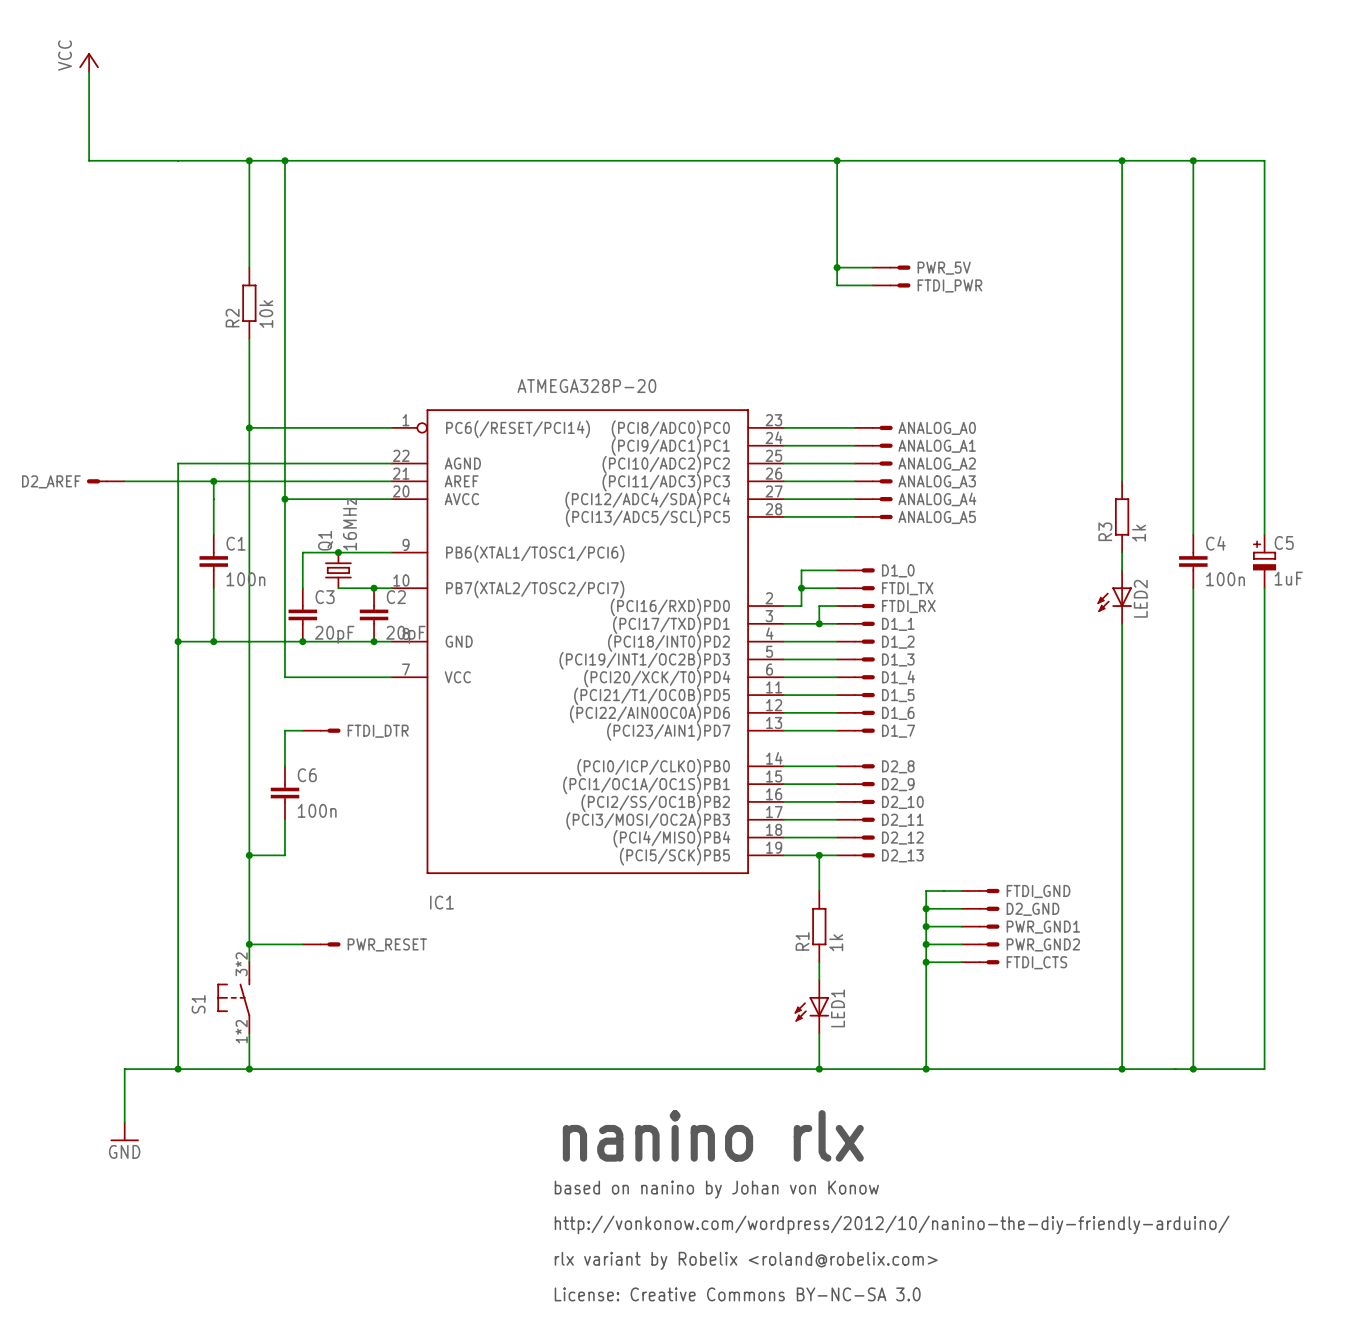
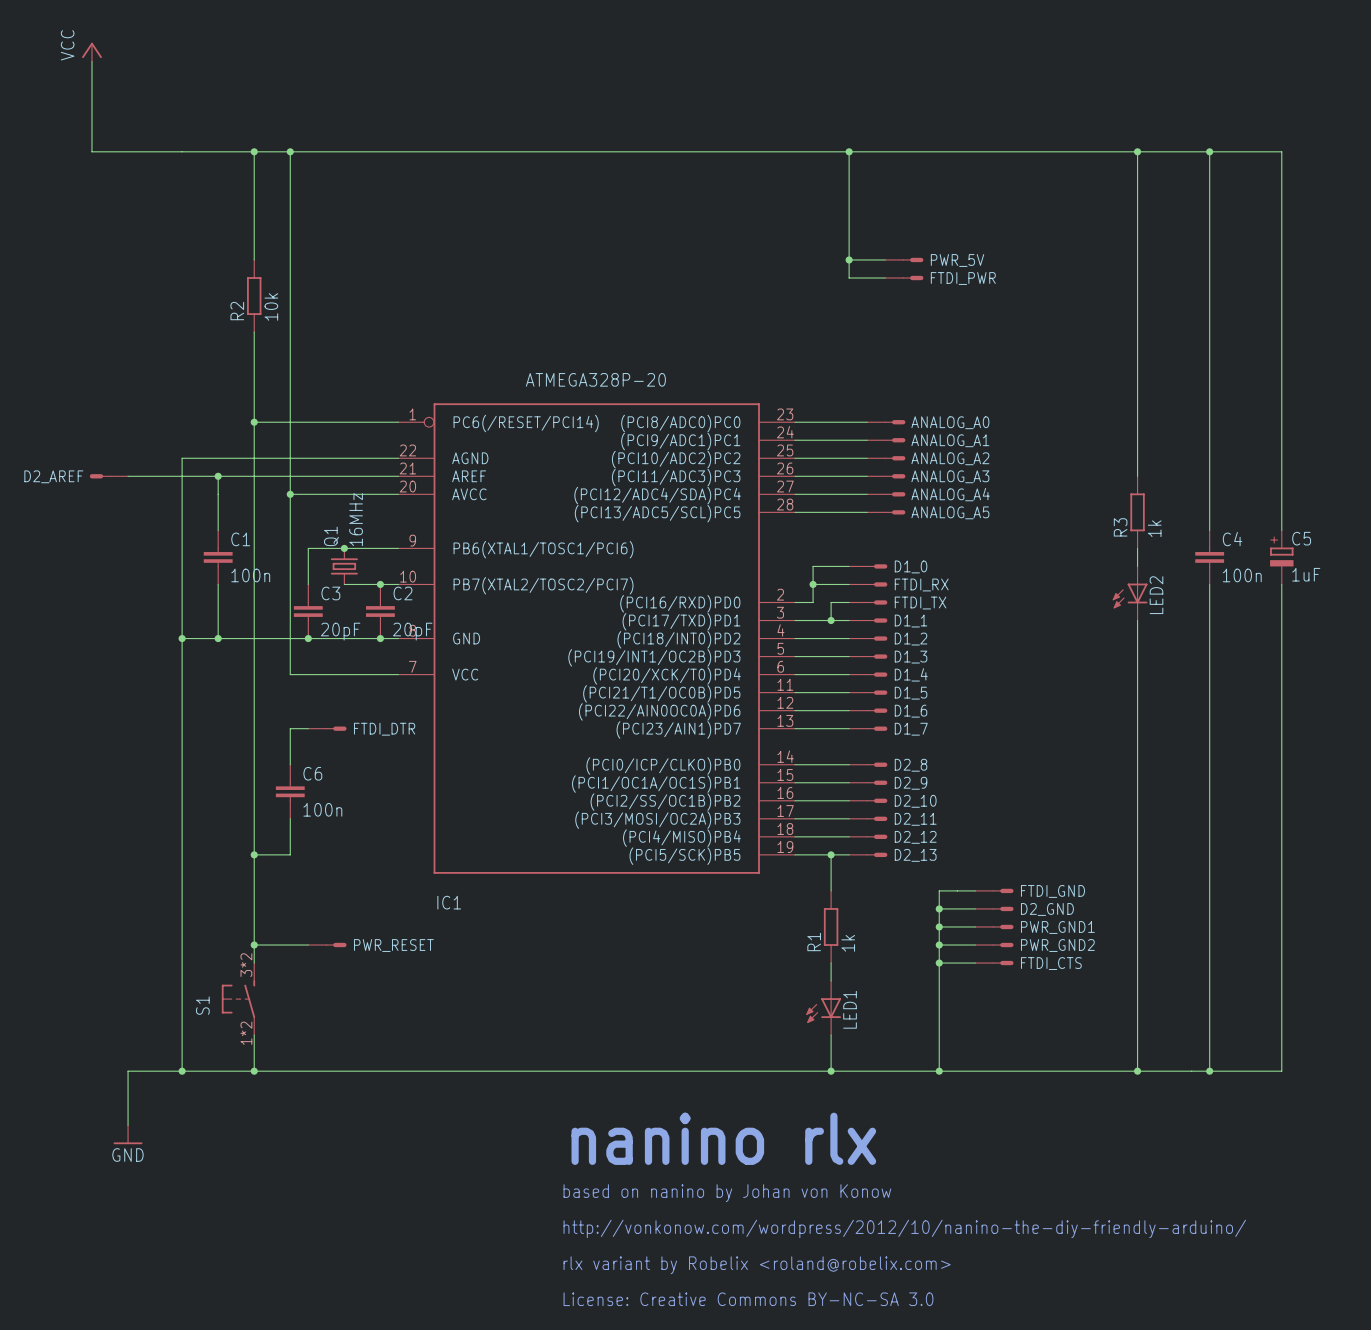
FTDI_TX name: FTDI_TX (907, 588) -> FTDI_RX (921, 584)
FTDI_RX name: FTDI_RX (908, 606) -> FTDI_TX (920, 603)

